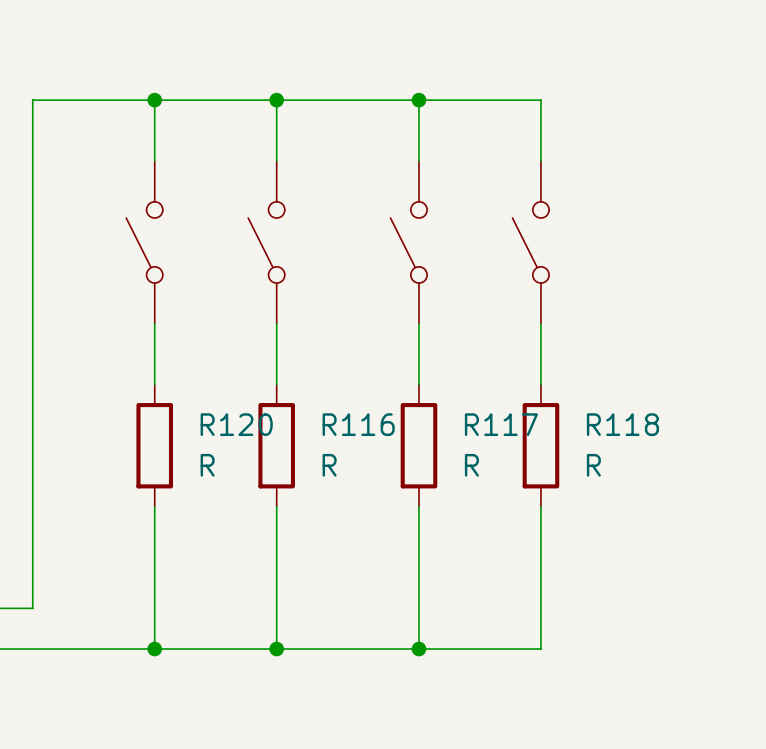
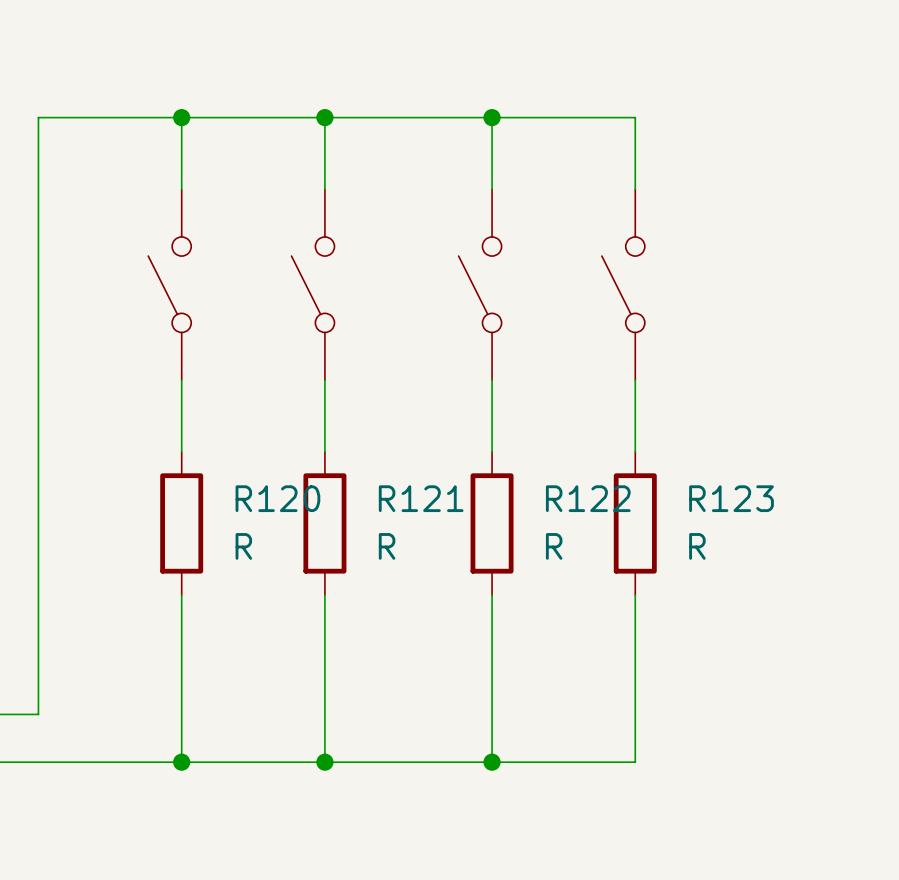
R116 name: R116 (358, 424) -> R121 (421, 498)
R117 name: R117 (501, 424) -> R122 (588, 498)
R118 name: R118 (622, 424) -> R123 (731, 498)

